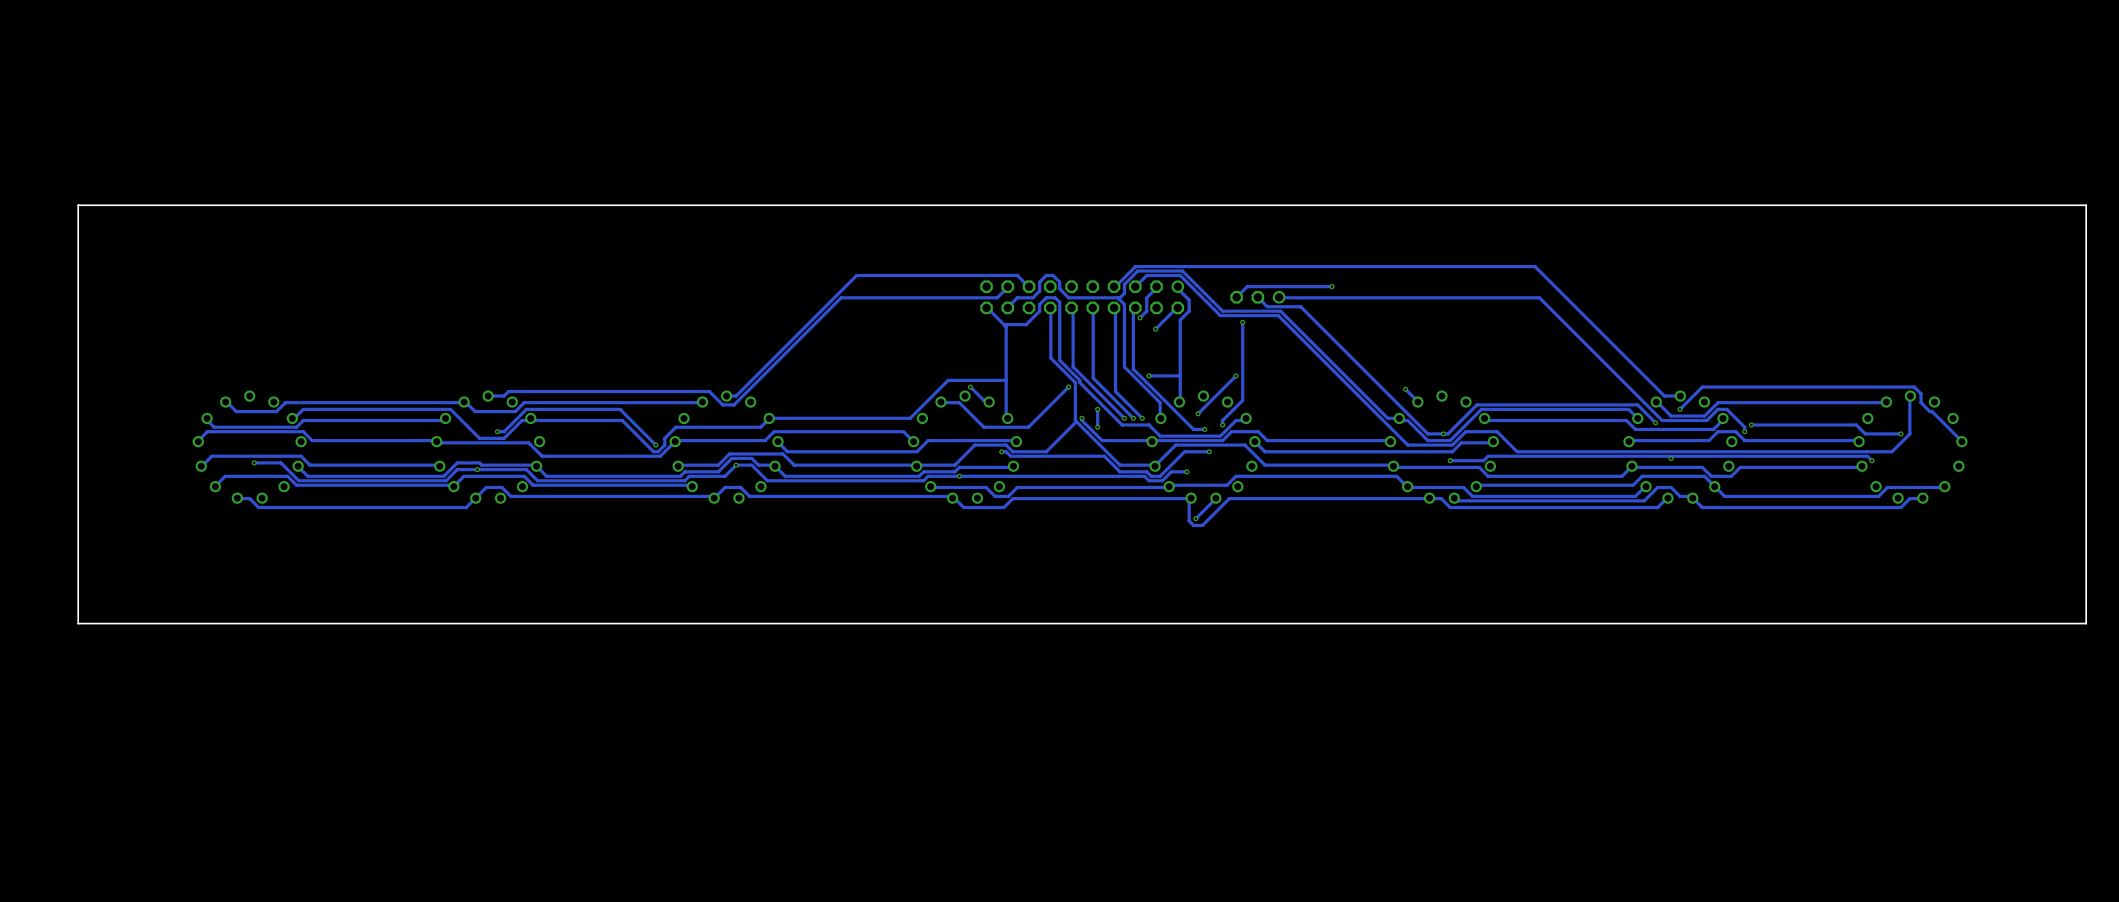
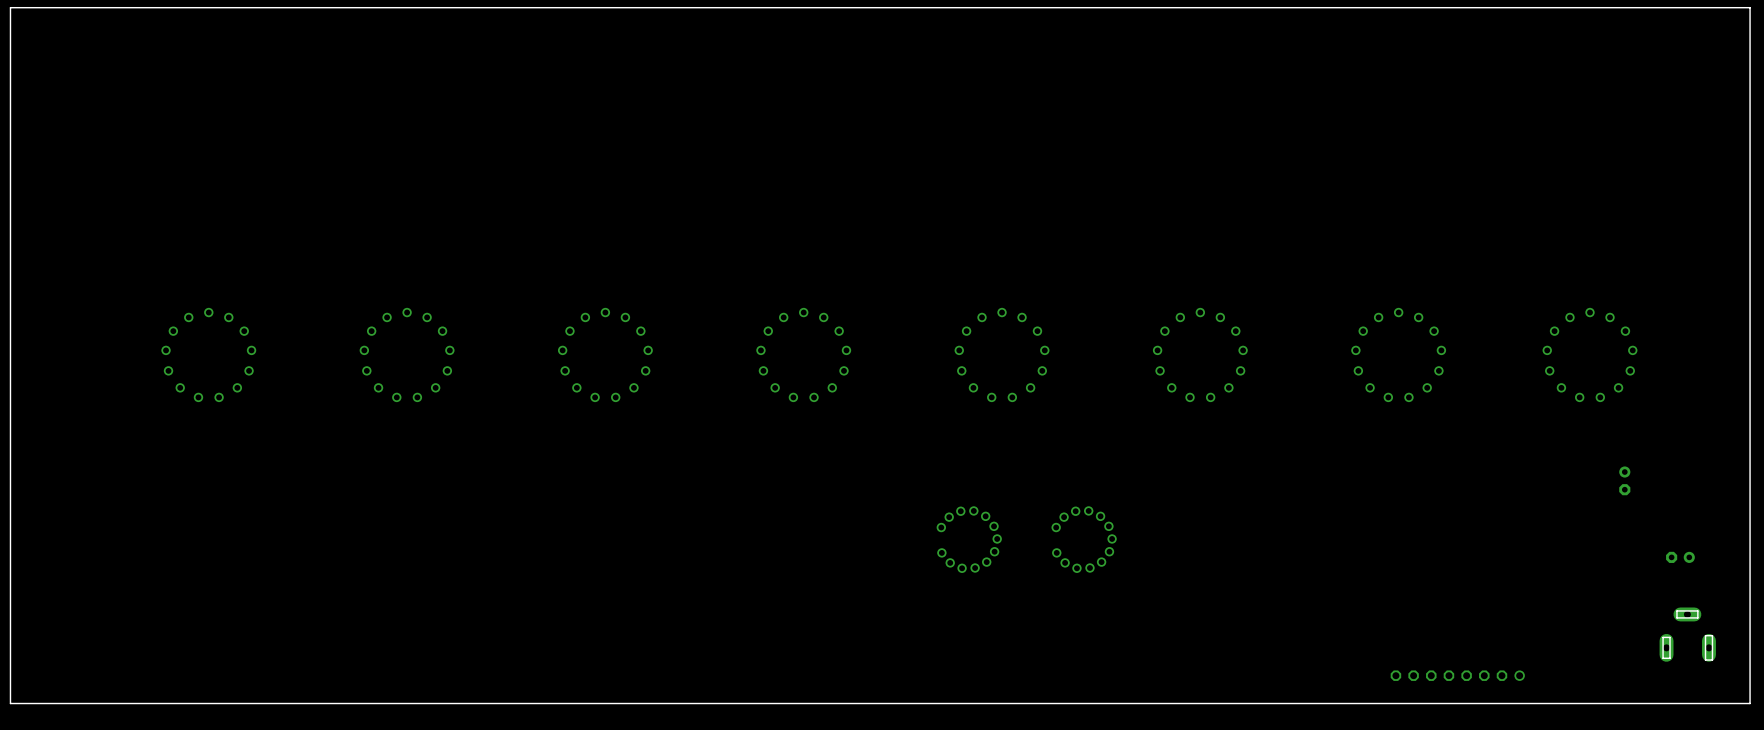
board edge: none -> (1750, 7) (10, 7) (10, 703) (1750, 703) (1750, 7)
board edge: (2086, 205) (78, 205) (78, 623) (2086, 623) (2086, 205) -> none
track: (1007, 286) (997, 297) (841, 297) (733, 404) (722, 404) (709, 391) (508, 391) (504, 395) (488, 396) -> none
track: (1029, 286) (1017, 275) (856, 275) (736, 395) (726, 396) -> none
track: (1114, 286) (1135, 266) (1535, 266) (1664, 395) (1680, 396) -> none
track: (1135, 286) (1146, 275) (1180, 275) (1220, 315) (1278, 315) (1407, 445) (1452, 445) (1465, 431) (1497, 431) (1517, 451) (1892, 451) (1909, 433) (1910, 396) -> none
track: (1156, 286) (1146, 297) (1146, 311) (1140, 317) -> none
track: (1177, 286) (1189, 300) (1189, 311) (1180, 320) (1179, 402) -> none
track: (1331, 286) (1247, 286) (1236, 297) -> none
via: (1331, 286) -> none
part: (1082, 297) -> none
track: (1257, 297) (1267, 306) (1300, 306) (1427, 433) (1447, 433) (1476, 404) (1637, 404) (1655, 422) -> none
part: (1257, 297) -> none
track: (1279, 297) (1539, 297) (1662, 420) (1706, 420) (1717, 409) (1726, 409) (1744, 427) (1744, 431) -> none
track: (1118, 298) (1124, 293) (1124, 284) (1137, 271) (1182, 271) (1222, 311) (1280, 311) (1387, 418) (1407, 420) (1427, 440) (1450, 440) (1481, 409) (1628, 409) (1637, 418) -> none
track: (986, 307) (1006, 326) (1007, 418) -> none
track: (1007, 307) (1017, 297) (1032, 297) (1039, 291) (1039, 282) (1046, 275) (1053, 275) (1059, 282) (1059, 288) (1068, 297) (1117, 297) (1124, 304) (1124, 366) (1160, 402) (1160, 418) -> none
track: (1050, 307) (1050, 358) (1075, 382) (1076, 421) -> none
track: (1071, 307) (1073, 308) (1073, 366) (1124, 418) -> none
track: (1092, 307) (1093, 378) (1133, 418) -> none
track: (1114, 307) (1115, 391) (1142, 418) -> none
track: (1135, 307) (1133, 308) (1133, 369) (1193, 429) (1204, 429) -> none
track: (1177, 307) (1155, 329) -> none
via: (1140, 317) -> none
track: (1242, 322) (1242, 400) (1222, 420) (1222, 424) -> none
via: (1242, 322) -> none
track: (1005, 325) (1026, 324) (1039, 311) (1039, 304) (1046, 297) (1055, 297) (1059, 302) (1059, 360) (1122, 424) (1148, 424) (1160, 436) (1220, 436) (1236, 420) (1244, 420) (1246, 418) -> none
via: (1155, 329) -> none
via: (1148, 375) -> none
track: (1180, 375) (1148, 375) -> none
track: (1236, 375) (1198, 413) -> none
via: (1236, 375) -> none
track: (1006, 380) (948, 380) (910, 418) (769, 418) (760, 427) (675, 427) (664, 438) (664, 445) (658, 451) (653, 451) (622, 420) (530, 420) (530, 418) (528, 420) (521, 420) (504, 438) (479, 438) (450, 409) (303, 409) (292, 418) -> none
track: (970, 387) (983, 400) (989, 402) -> none
via: (970, 387) -> none
track: (1068, 387) (1028, 427) (983, 427) (959, 402) (940, 402) -> none
via: (1068, 387) -> none
track: (1405, 389) (1417, 402) -> none
via: (1405, 389) -> none
track: (702, 402) (524, 402) (515, 411) (475, 411) (464, 402) (285, 402) (276, 411) (236, 411) (225, 402) -> none
track: (1886, 402) (1717, 402) (1704, 416) (1671, 416) (1656, 402) -> none
track: (1097, 409) (1097, 427) -> none
via: (1097, 409) -> none
track: (1680, 409) (1702, 387) (1914, 387) (1921, 393) (1921, 402) (1961, 441) -> none
via: (1680, 409) -> none
via: (1198, 413) -> none
track: (445, 418) (443, 420) (303, 420) (296, 427) (214, 427) (207, 418) -> none
track: (1082, 418) (1102, 440) (1222, 440) (1231, 431) (1258, 431) (1267, 440) (1390, 441) -> none
via: (1082, 418) -> none
via: (1124, 418) -> none
via: (1133, 418) -> none
via: (1142, 418) -> none
track: (1722, 418) (1713, 429) (1635, 429) (1626, 420) (1485, 420) (1484, 418) -> none
track: (1076, 421) (1119, 465) (1155, 466) (1175, 445) (1244, 445) (1265, 465) (1479, 467) (1488, 476) (1622, 476) (1631, 466) (1702, 467) (1711, 476) (1731, 476) (1740, 467) (1862, 466) -> none
track: (1076, 421) (1046, 451) (1012, 451) (1006, 445) (974, 445) (954, 465) (794, 465) (783, 453) (729, 453) (718, 465) (678, 466) -> none
via: (1655, 422) -> none
via: (1222, 424) -> none
track: (1751, 424) (1856, 424) (1865, 433) (1900, 433) -> none
via: (1751, 424) -> none
via: (1097, 427) -> none
via: (1204, 429) -> none
track: (497, 431) (504, 431) (526, 409) (620, 409) (655, 445) -> none
via: (497, 431) -> none
via: (1744, 431) -> none
via: (1443, 433) -> none
via: (1900, 433) -> none
track: (913, 441) (903, 431) (774, 431) (765, 440) (675, 440) (660, 456) (542, 456) (528, 442) (312, 440) (303, 431) (207, 431) (198, 441) -> none
track: (1016, 441) (928, 440) (916, 451) (787, 451) (778, 441) -> none
track: (1493, 441) (1461, 442) (1452, 451) (1265, 451) (1254, 441) -> none
track: (1859, 441) (1744, 440) (1735, 431) (1717, 431) (1709, 440) (1628, 441) -> none
via: (655, 445) -> none
via: (1001, 451) -> none
track: (1209, 451) (1184, 451) (1160, 476) (1151, 476) (1146, 471) (1119, 471) (1104, 456) (1010, 456) (1006, 451) (1001, 451) -> none
via: (1209, 451) -> none
via: (1671, 458) -> none
via: (1450, 460) -> none
track: (1871, 460) (1867, 456) (1673, 456) (1671, 458) (1671, 456) (1488, 456) (1483, 460) (1450, 460) -> none
via: (1871, 460) -> none
track: (254, 462) (281, 462) (298, 480) (446, 480) (457, 469) (526, 469) (537, 480) (684, 480) (689, 476) (725, 476) (736, 465) (751, 465) (767, 480) (923, 480) (928, 476) (1144, 476) (1148, 480) (1162, 480) (1171, 471) (1186, 471) -> none
via: (254, 462) -> none
via: (736, 465) -> none
track: (439, 466) (310, 465) (301, 456) (211, 456) (201, 466) -> none
track: (1013, 466) (959, 467) (954, 471) (923, 471) (919, 476) (785, 476) (774, 465) (758, 465) (751, 458) (731, 458) (718, 471) (684, 471) (680, 476) (546, 476) (535, 465) (481, 465) (479, 462) (457, 462) (443, 476) (307, 476) (298, 466) -> none
via: (477, 469) -> none
via: (1186, 471) -> none
via: (959, 476) -> none
track: (692, 486) (533, 485) (524, 476) (463, 476) (453, 486) (296, 485) (287, 476) (225, 476) (215, 486) -> none
track: (1646, 486) (1635, 496) (1472, 496) (1463, 487) (1407, 487) (1396, 476) (1236, 476) (1227, 485) (1171, 485) (1169, 487) (1017, 487) (1008, 496) (995, 496) (986, 487) (930, 486) -> none
track: (1944, 486) (1887, 487) (1878, 496) (1724, 496) (1704, 476) (1642, 476) (1633, 485) (1476, 486) -> none
track: (237, 498) (249, 498) (258, 507) (466, 507) (486, 487) (501, 487) (510, 496) (713, 496) (714, 498) (725, 487) (740, 487) (749, 496) (952, 496) (963, 507) (1003, 507) (1012, 498) (1189, 498) -> none
track: (1215, 498) (1195, 518) -> none
track: (1667, 498) (1657, 507) (1450, 507) (1441, 498) (1429, 498) (1229, 498) (1202, 525) (1193, 525) (1189, 520) (1189, 498) -> none
track: (1922, 498) (1909, 498) (1900, 507) (1702, 507) (1691, 496) (1680, 496) (1671, 487) (1657, 487) (1644, 500) (1456, 500) (1454, 498) -> none
via: (1195, 518) -> none
part: none -> (1624, 480)
part: none -> (969, 539)
part: none -> (1084, 539)
part: none -> (1680, 557)
part: none -> (1687, 634)
part: none -> (1457, 675)

